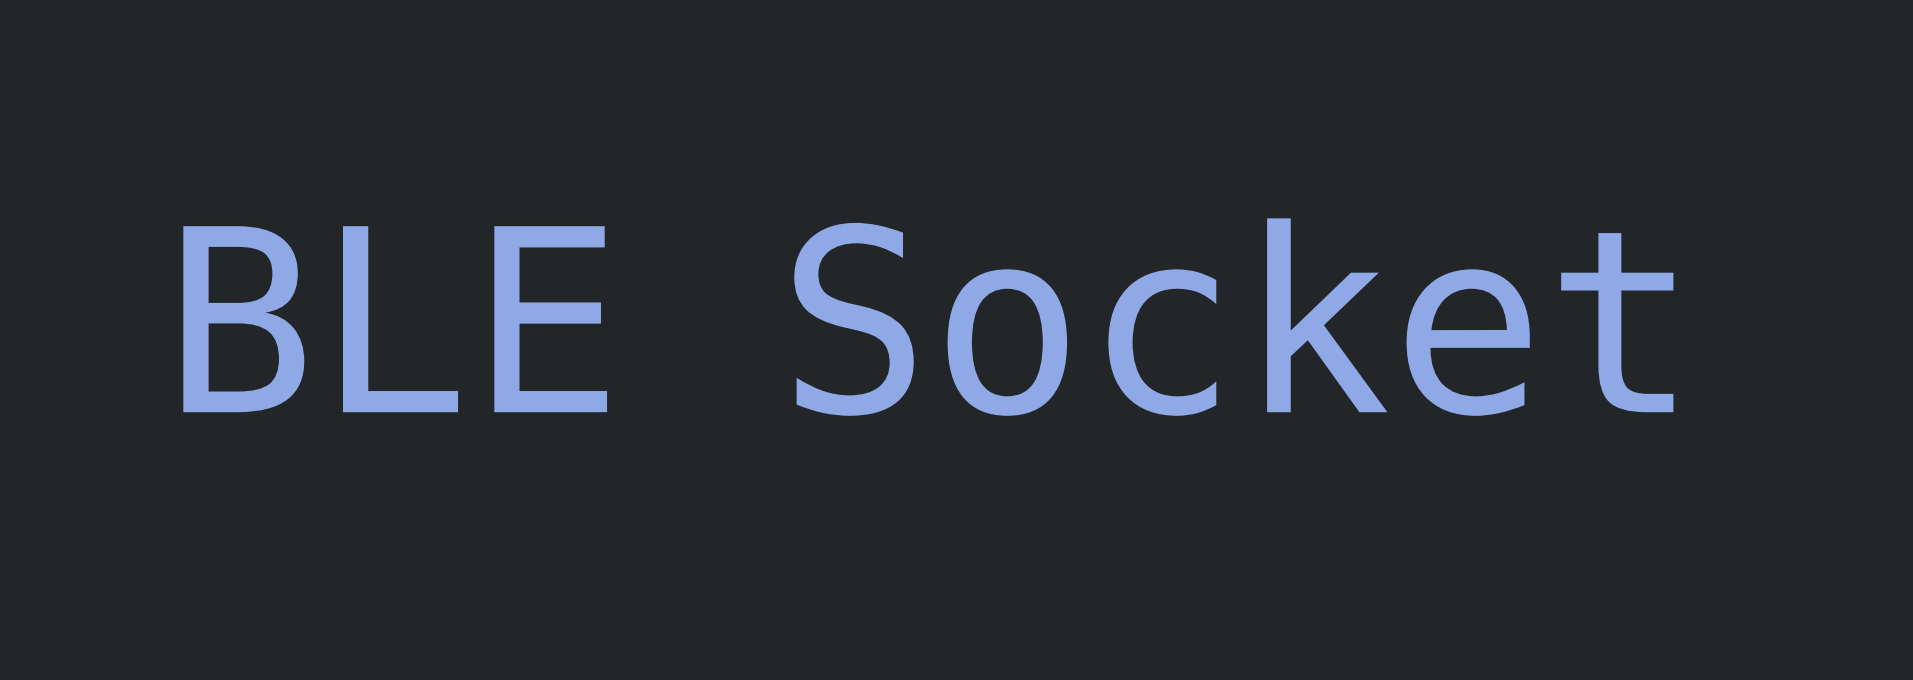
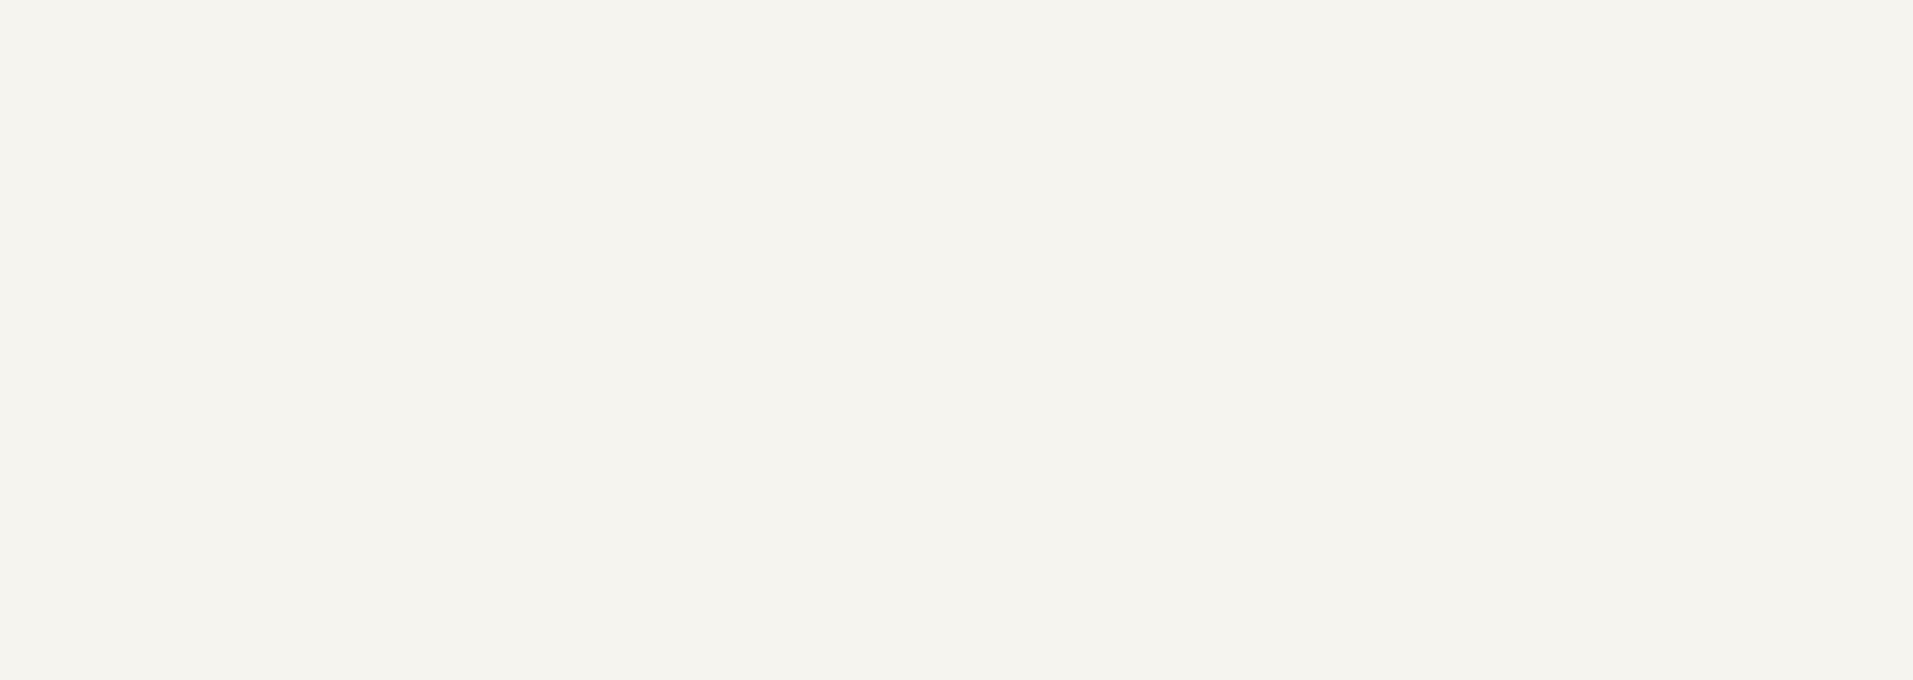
text: BLE Socket (928, 317) -> none

